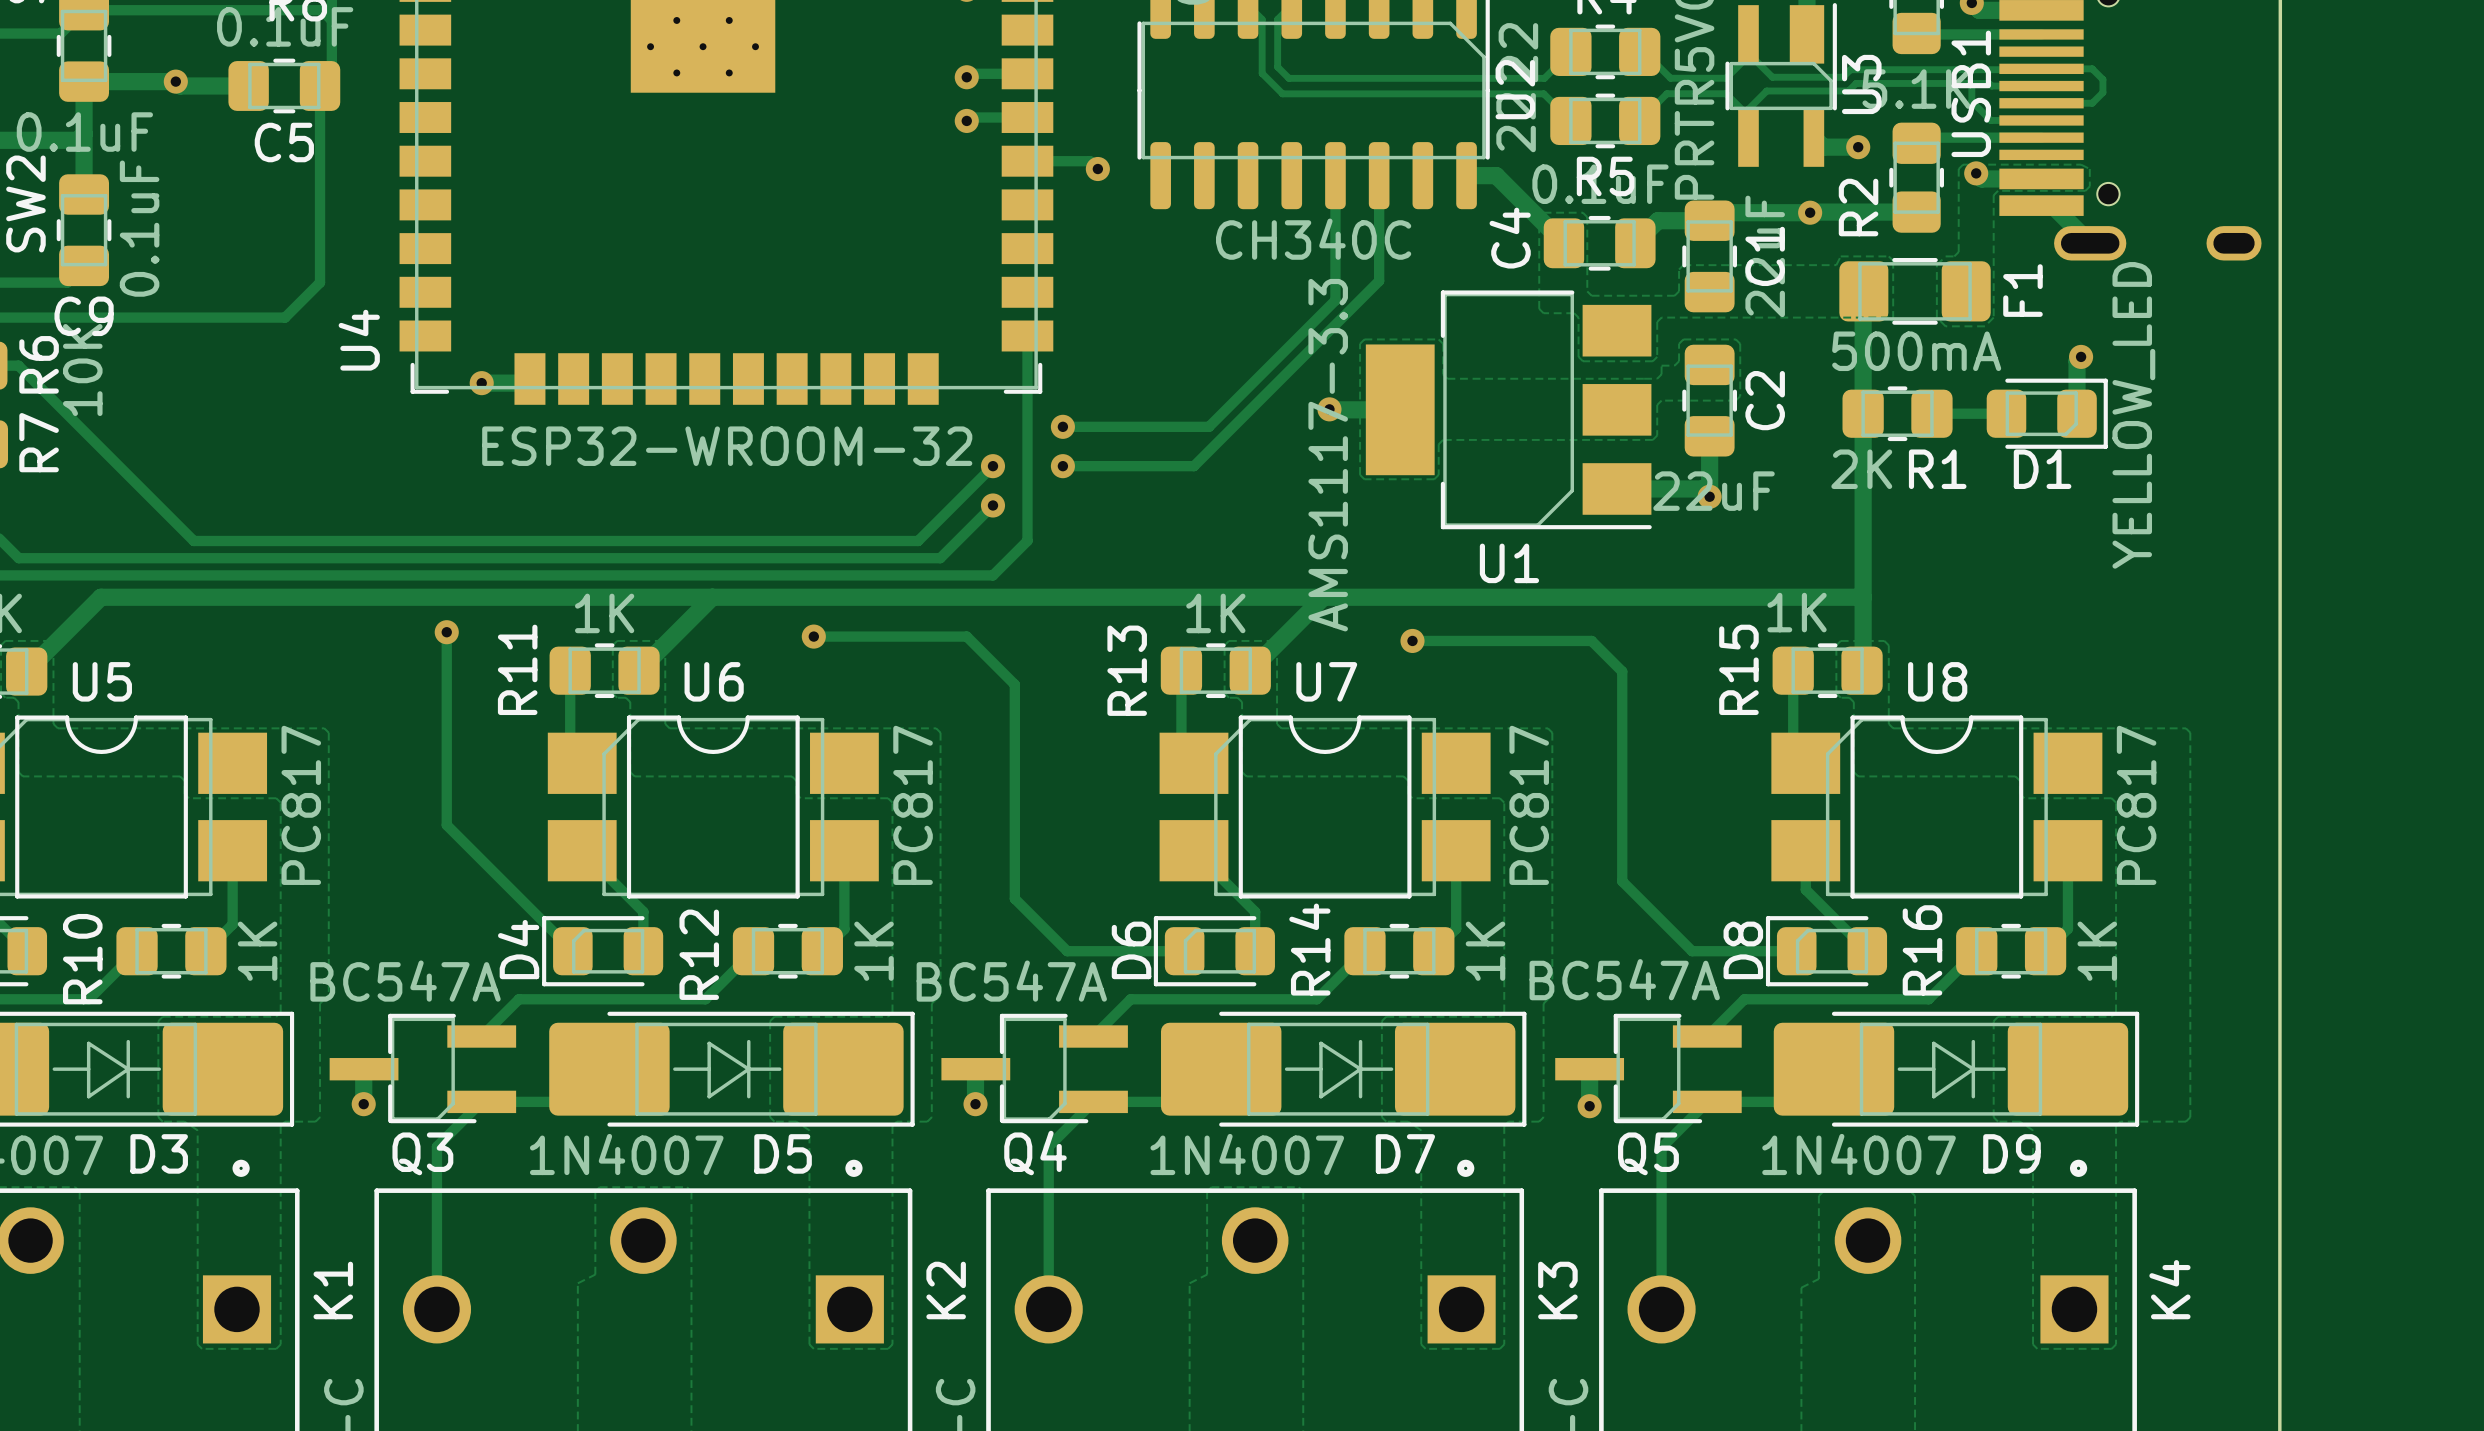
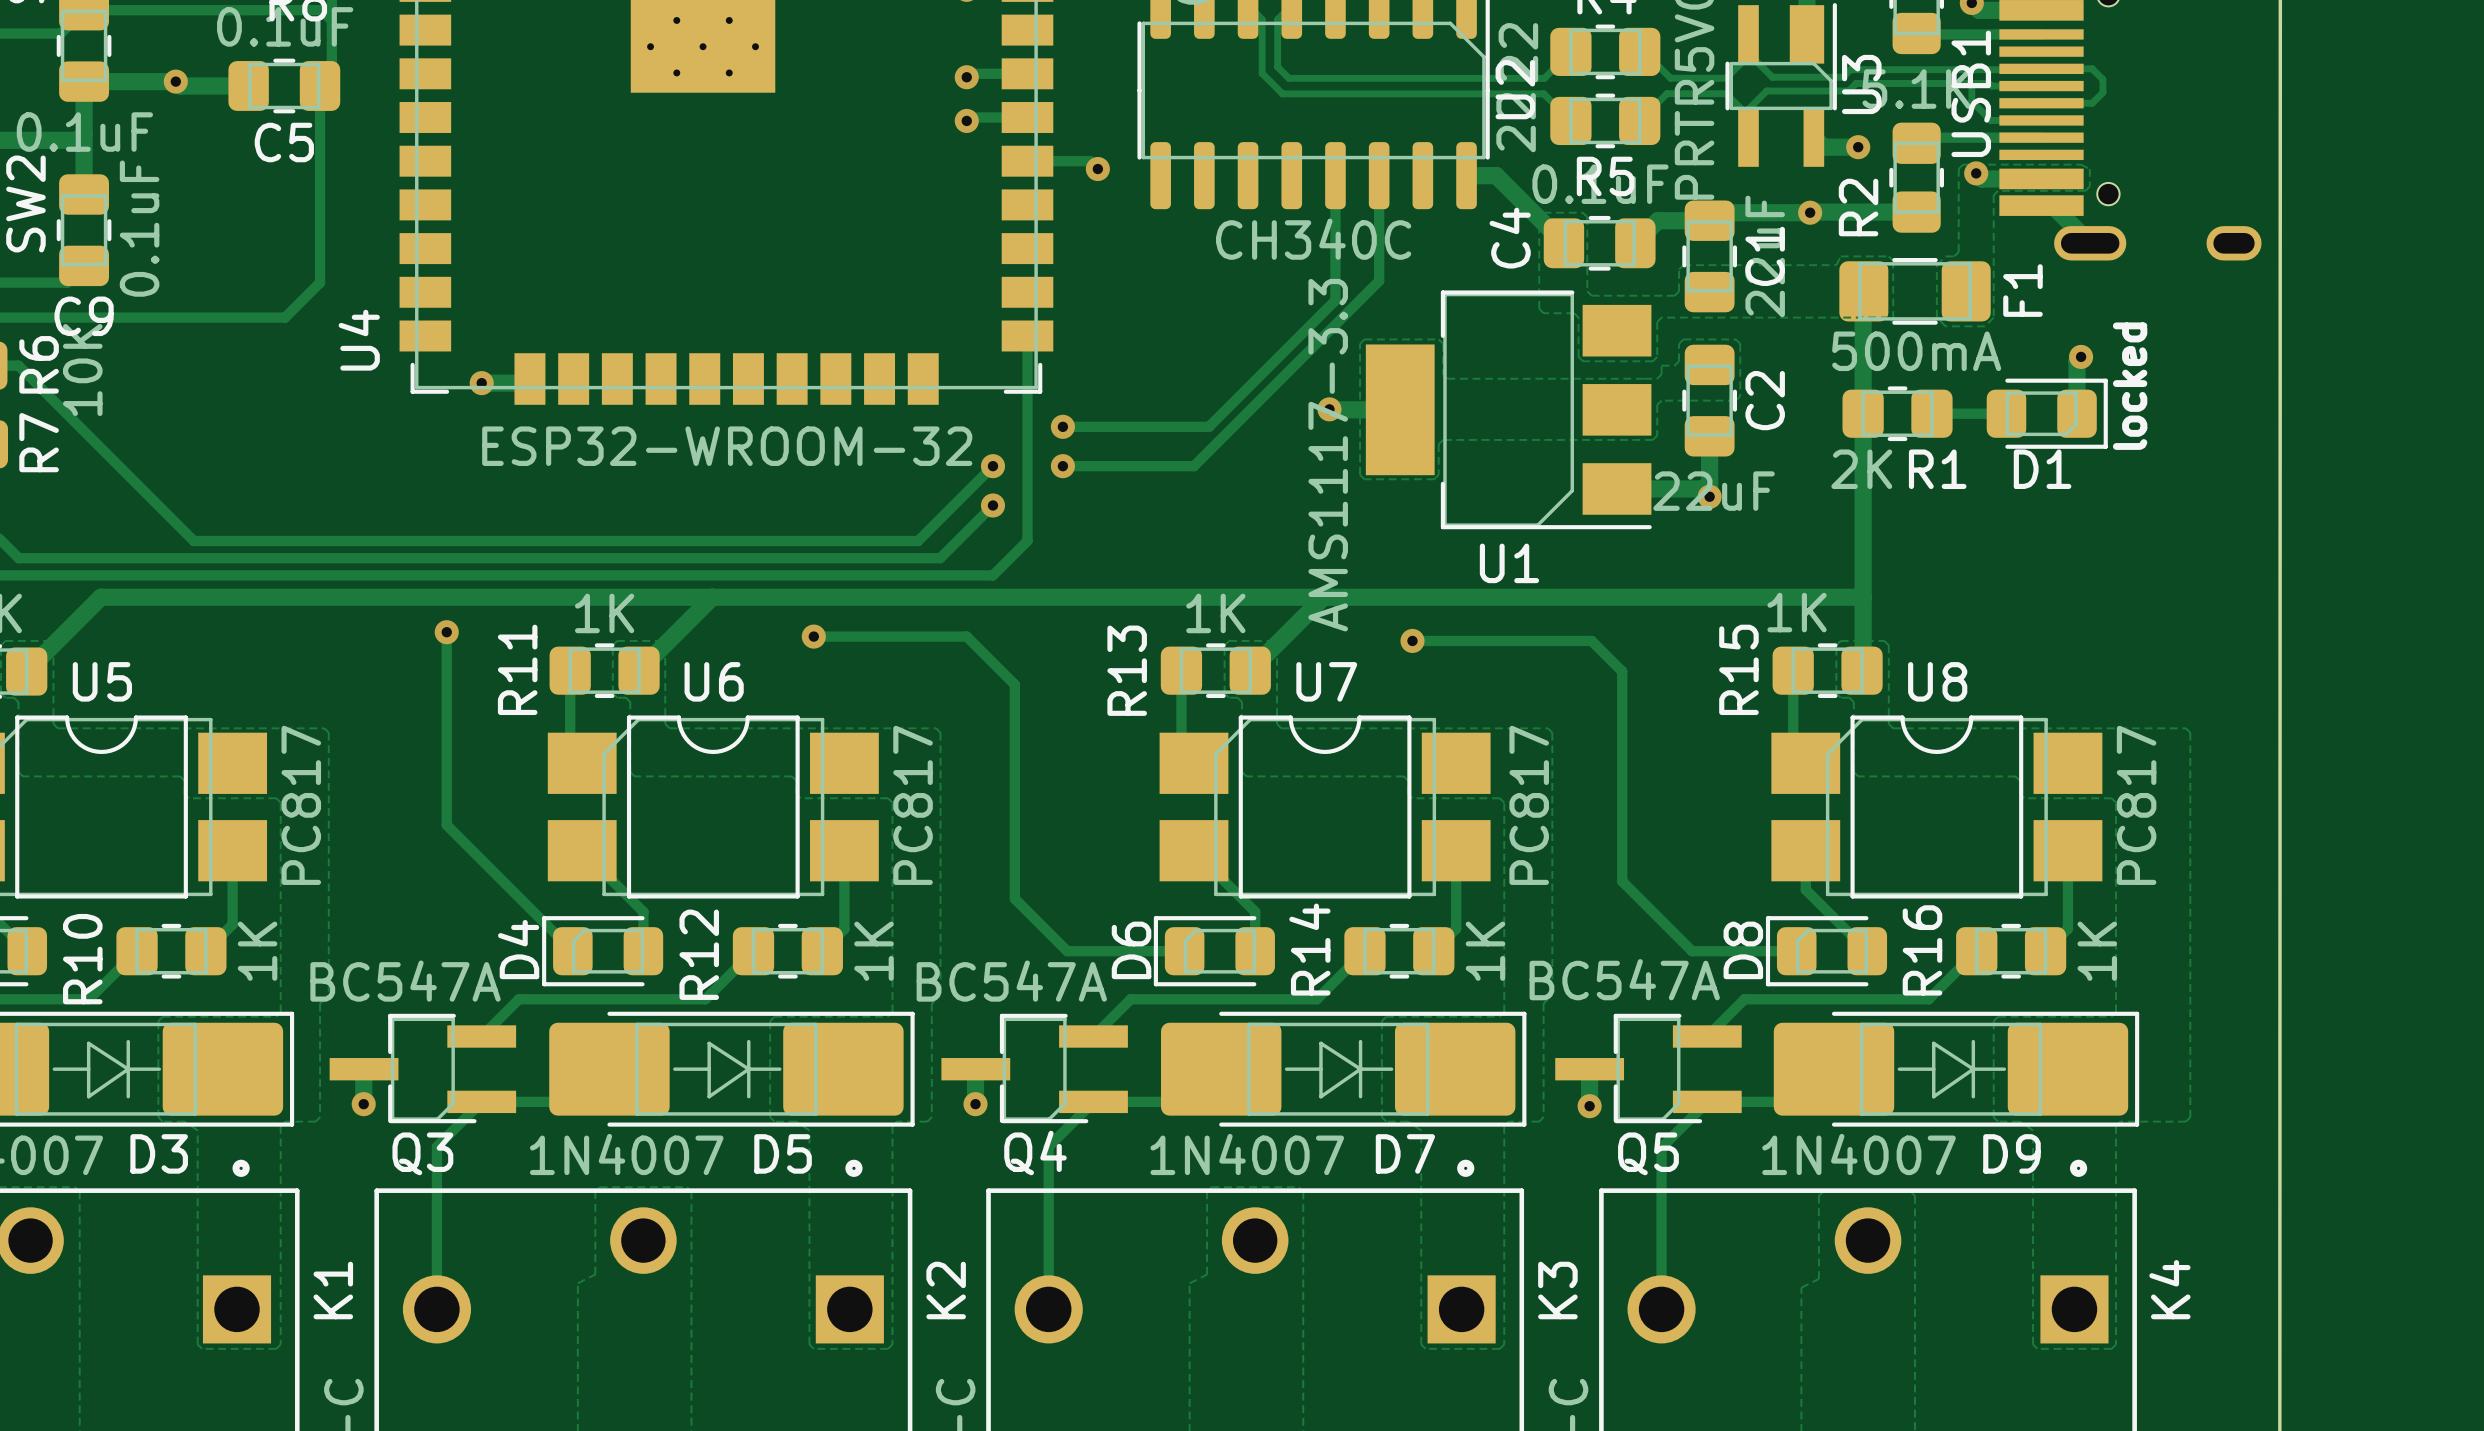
text: none -> locked (2130, 386)
D1 value: YELLOW_LED (2133, 415) -> none

